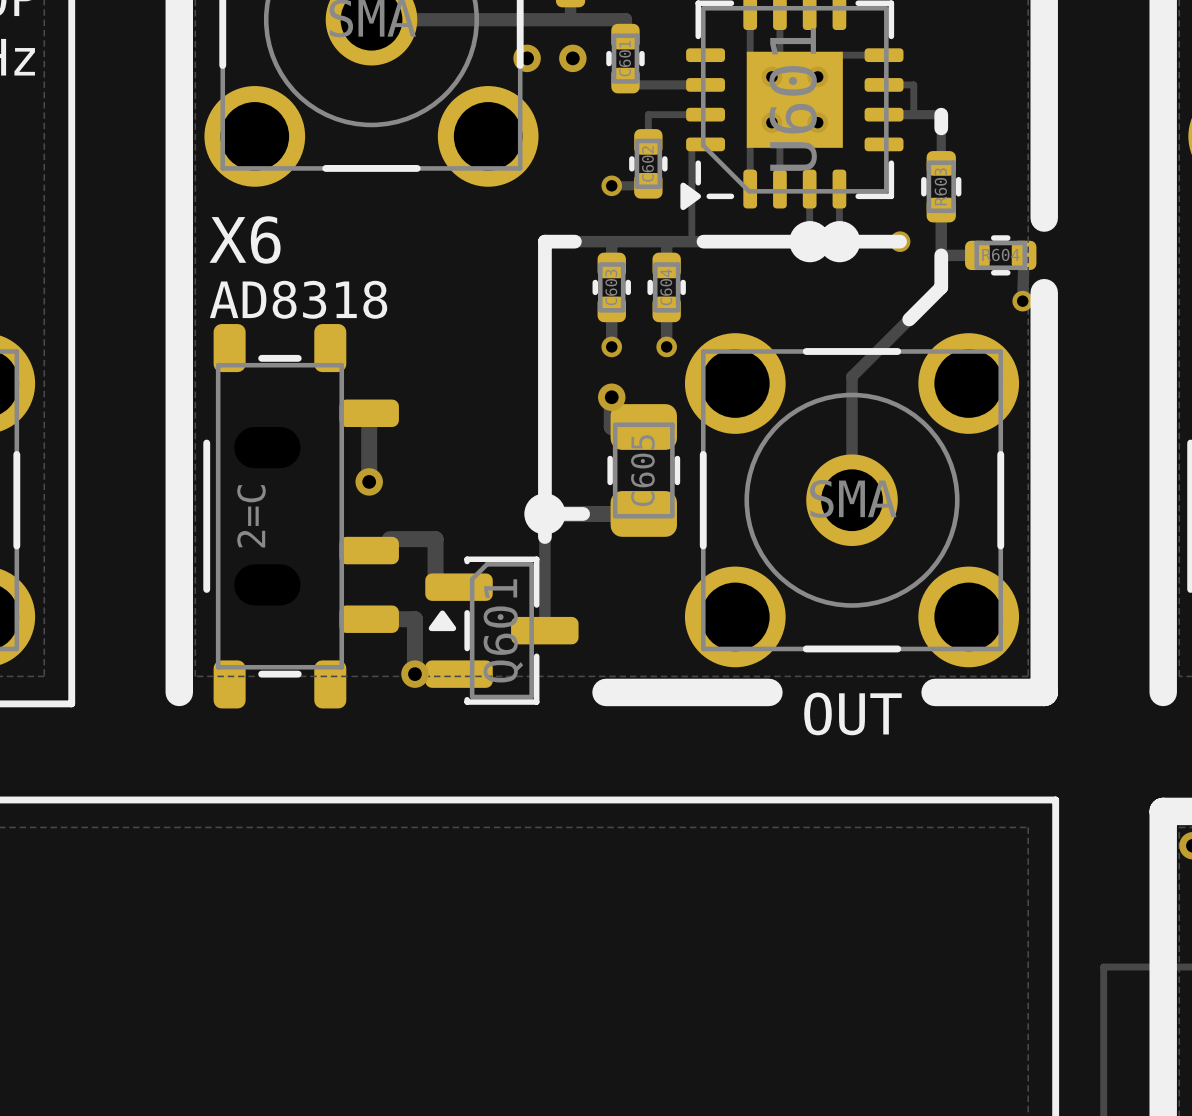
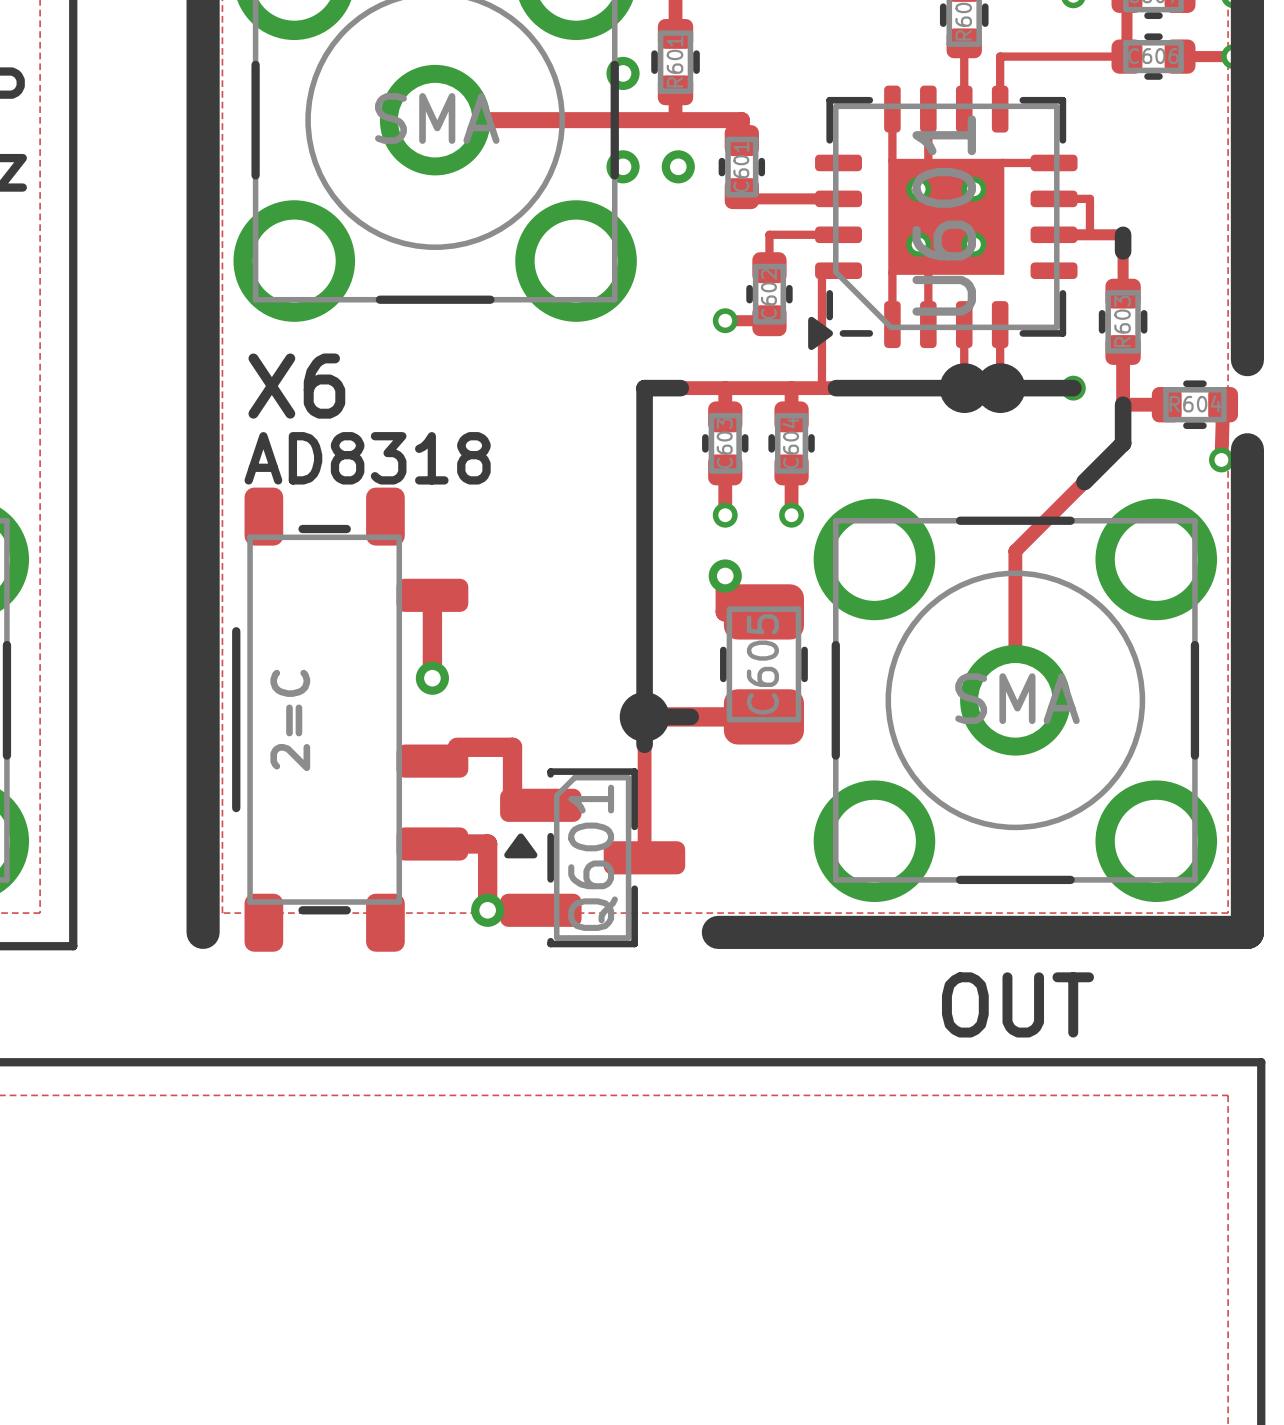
line: none -> (915, 932) (1115, 932)
text position: OUT (852, 713) -> OUT (1017, 1004)

